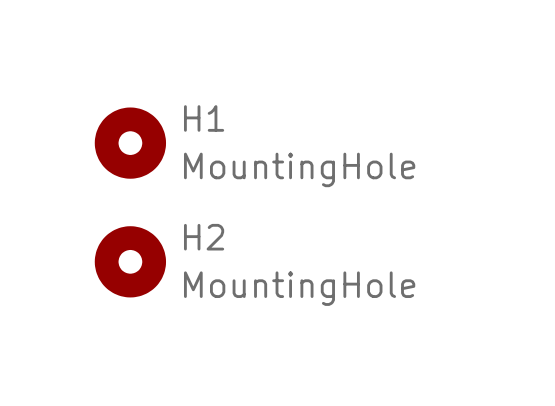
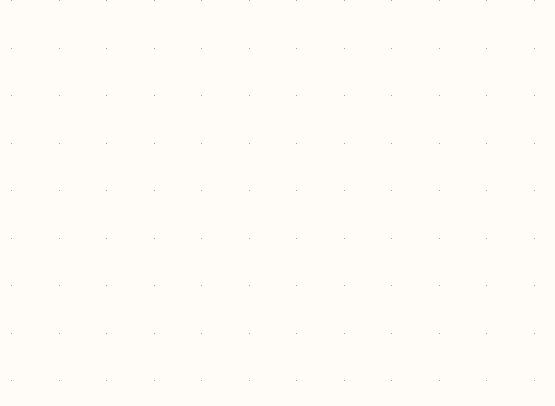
H1: MountingHole (130, 143) -> none
H2: MountingHole (130, 261) -> none

